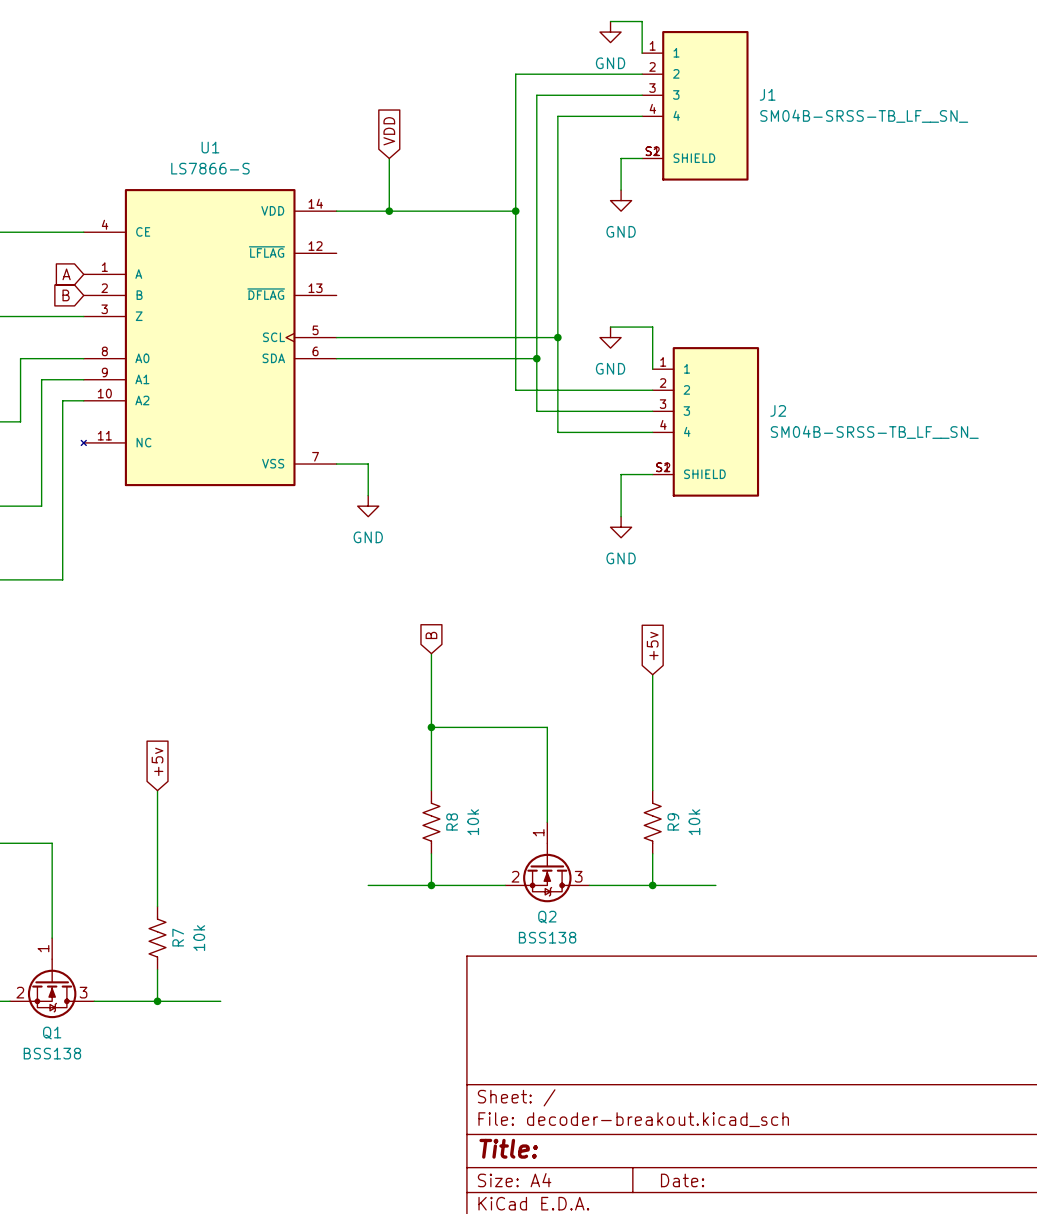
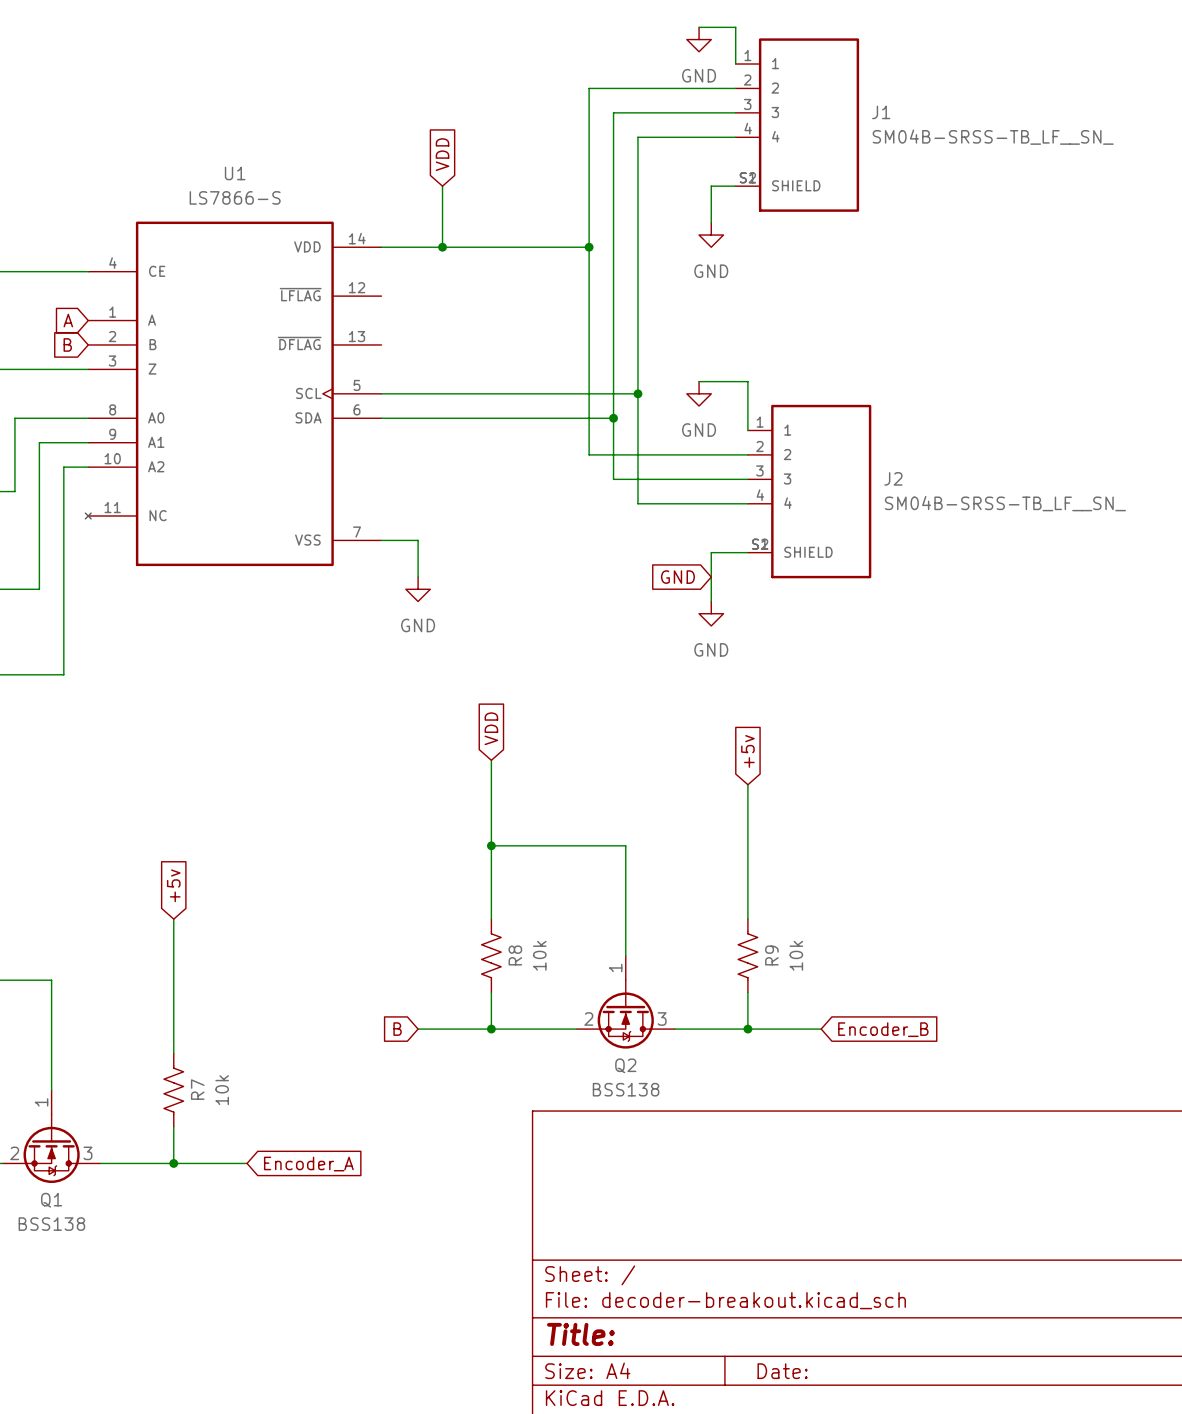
global label: none -> GND (677, 577)
global label: B (431, 635) -> VDD (491, 728)
global label: none -> B (397, 1029)
global label: none -> Encoder_B (883, 1029)
global label: none -> Encoder_A (308, 1164)

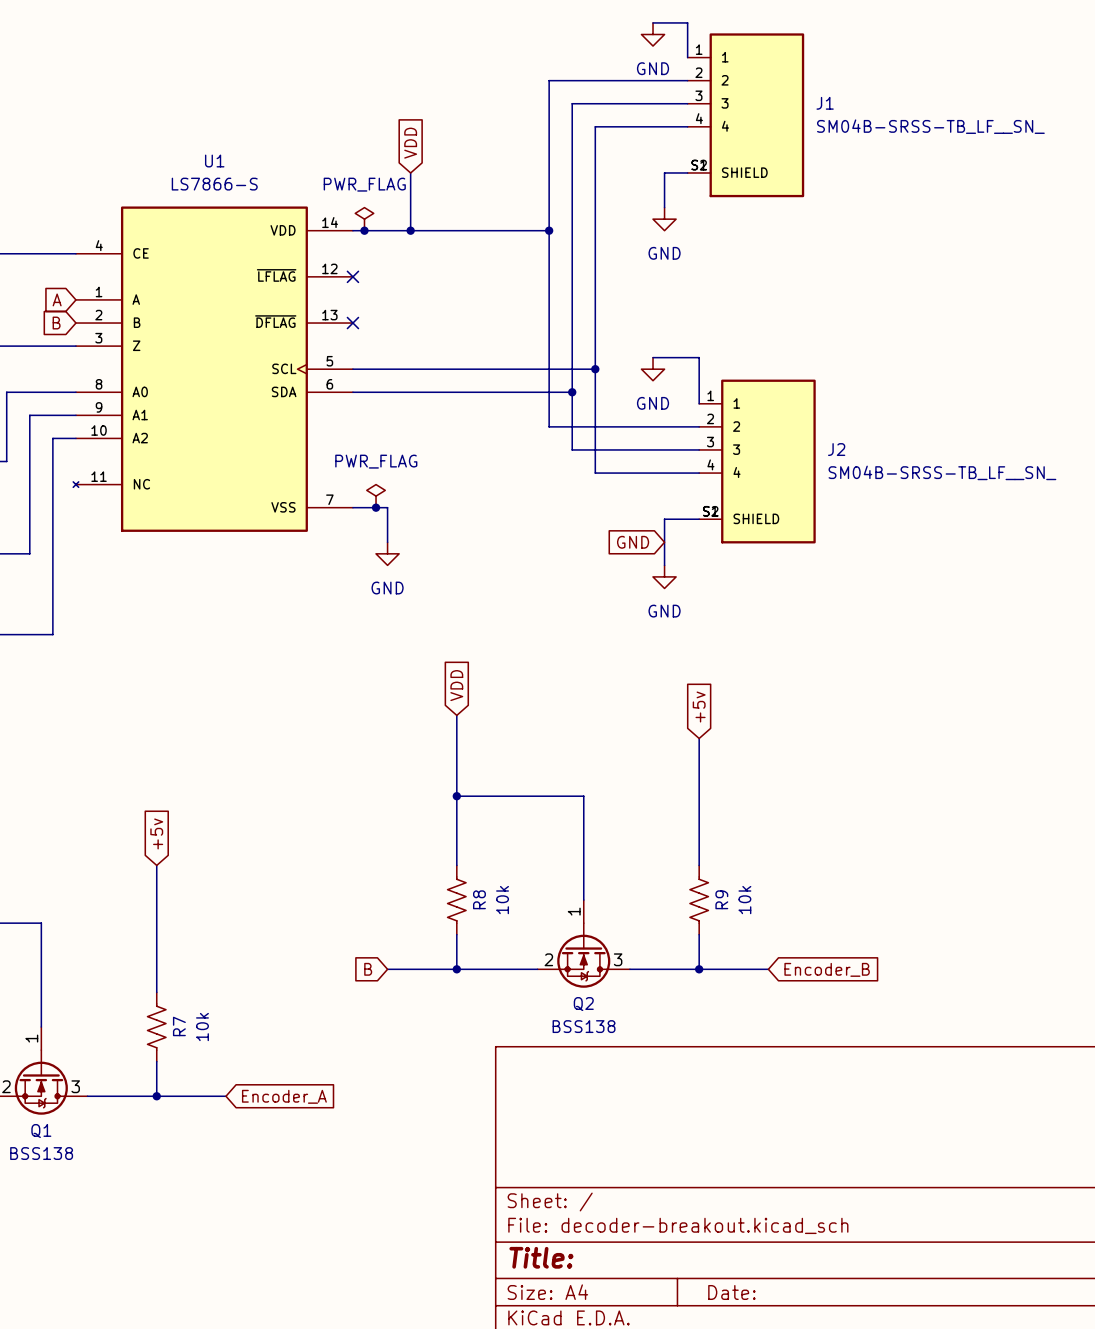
power symbol: none -> PWR_FLAG (364, 219)
junction: none -> (364, 230)
no-connect mark: none -> (352, 276)
no-connect mark: none -> (352, 323)
power symbol: none -> PWR_FLAG (376, 496)
junction: none -> (376, 507)

